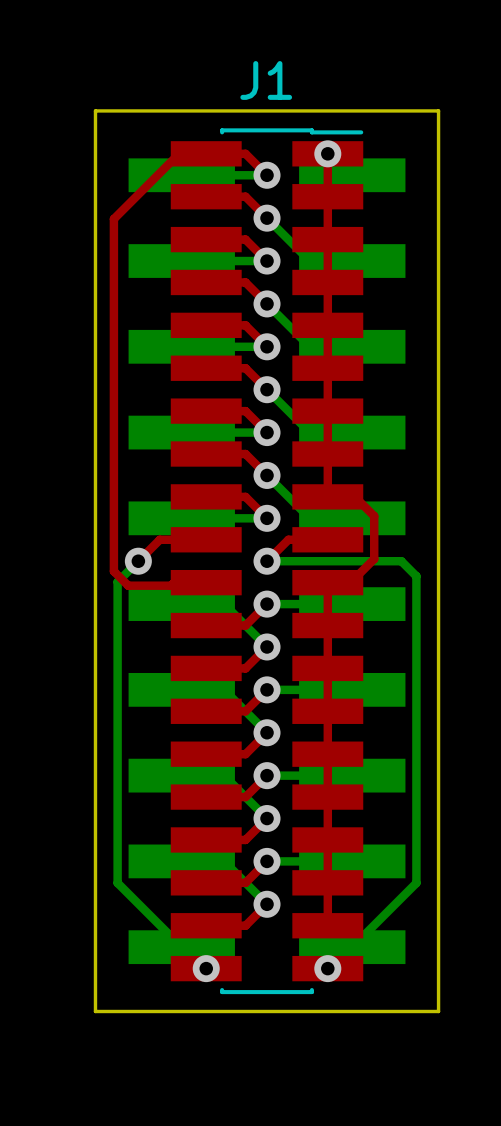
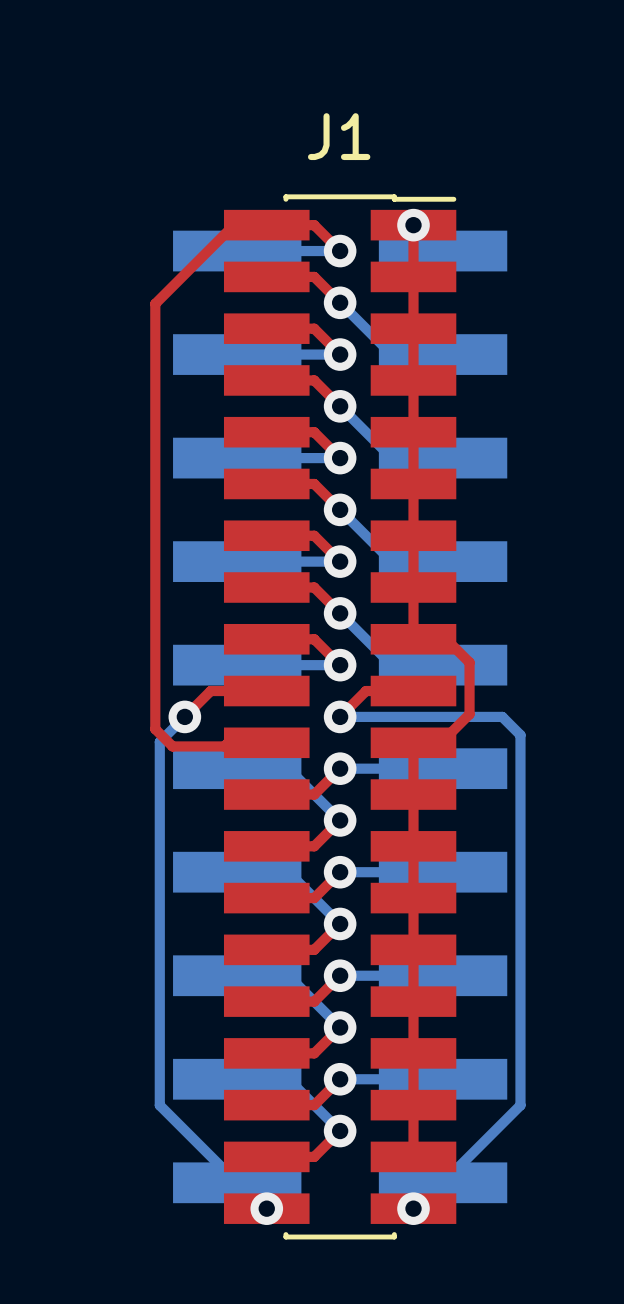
board edge: (95, 110) (438, 110) (438, 1011) (95, 1011) (95, 110) -> none

